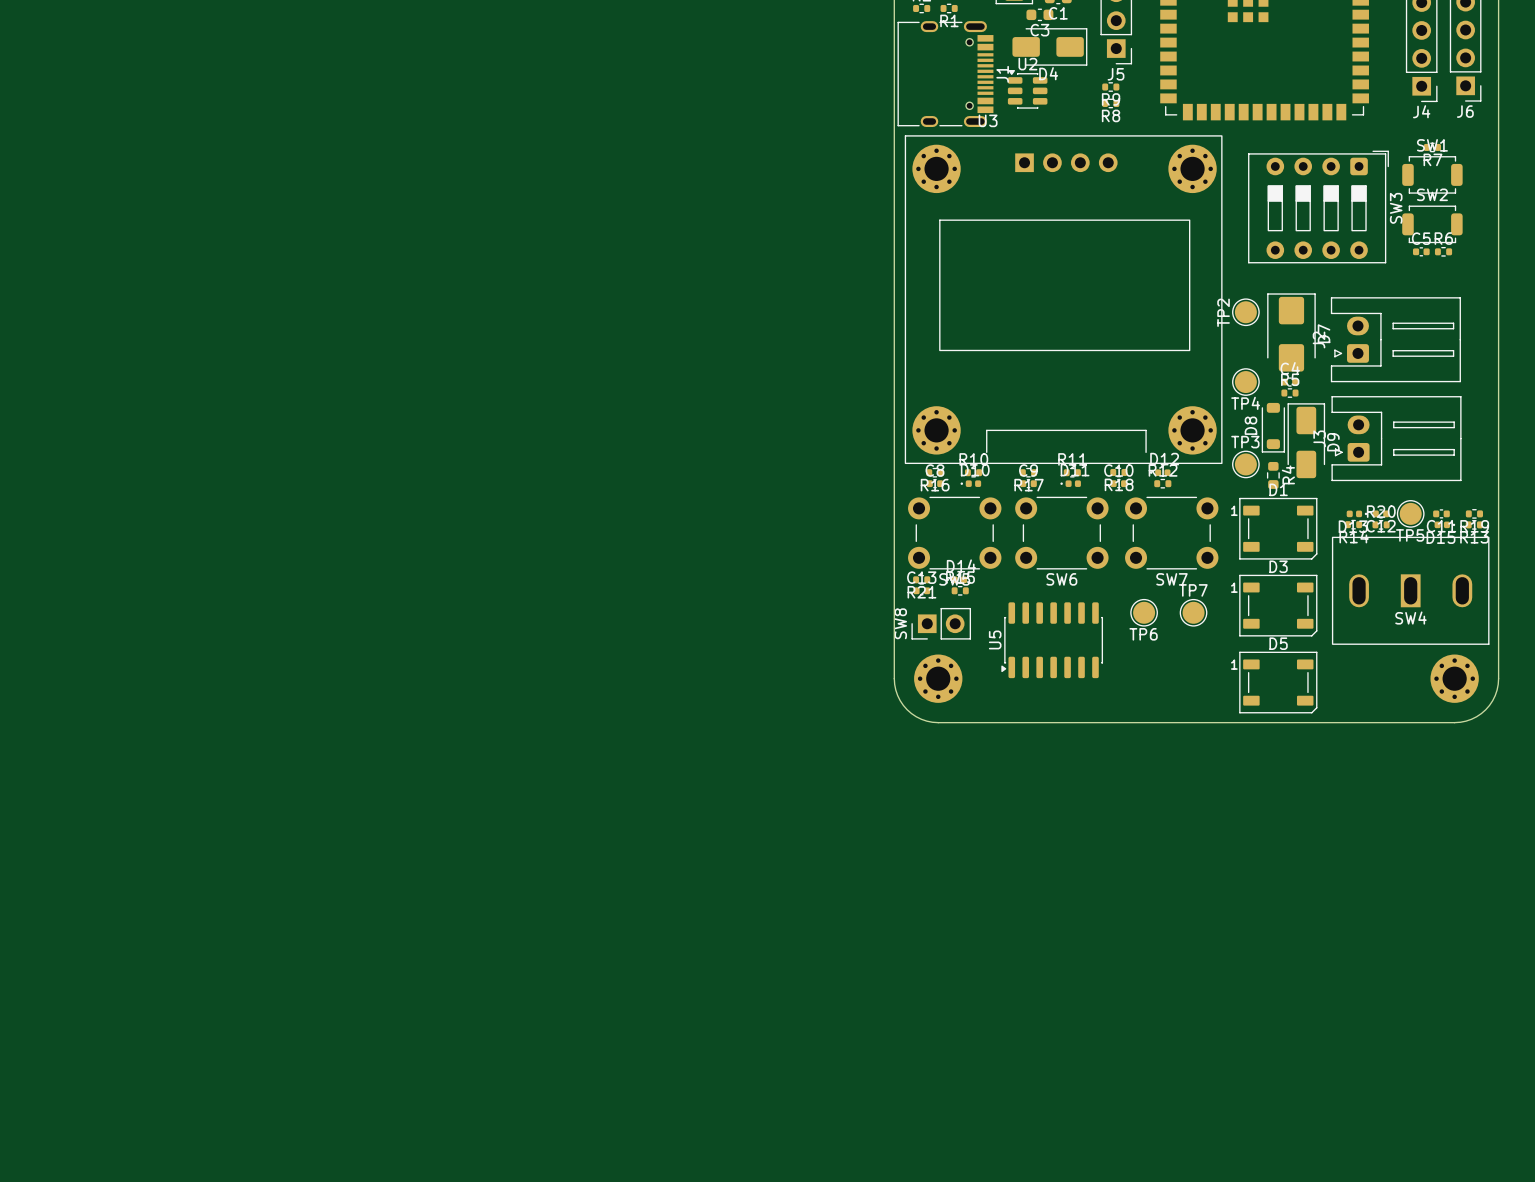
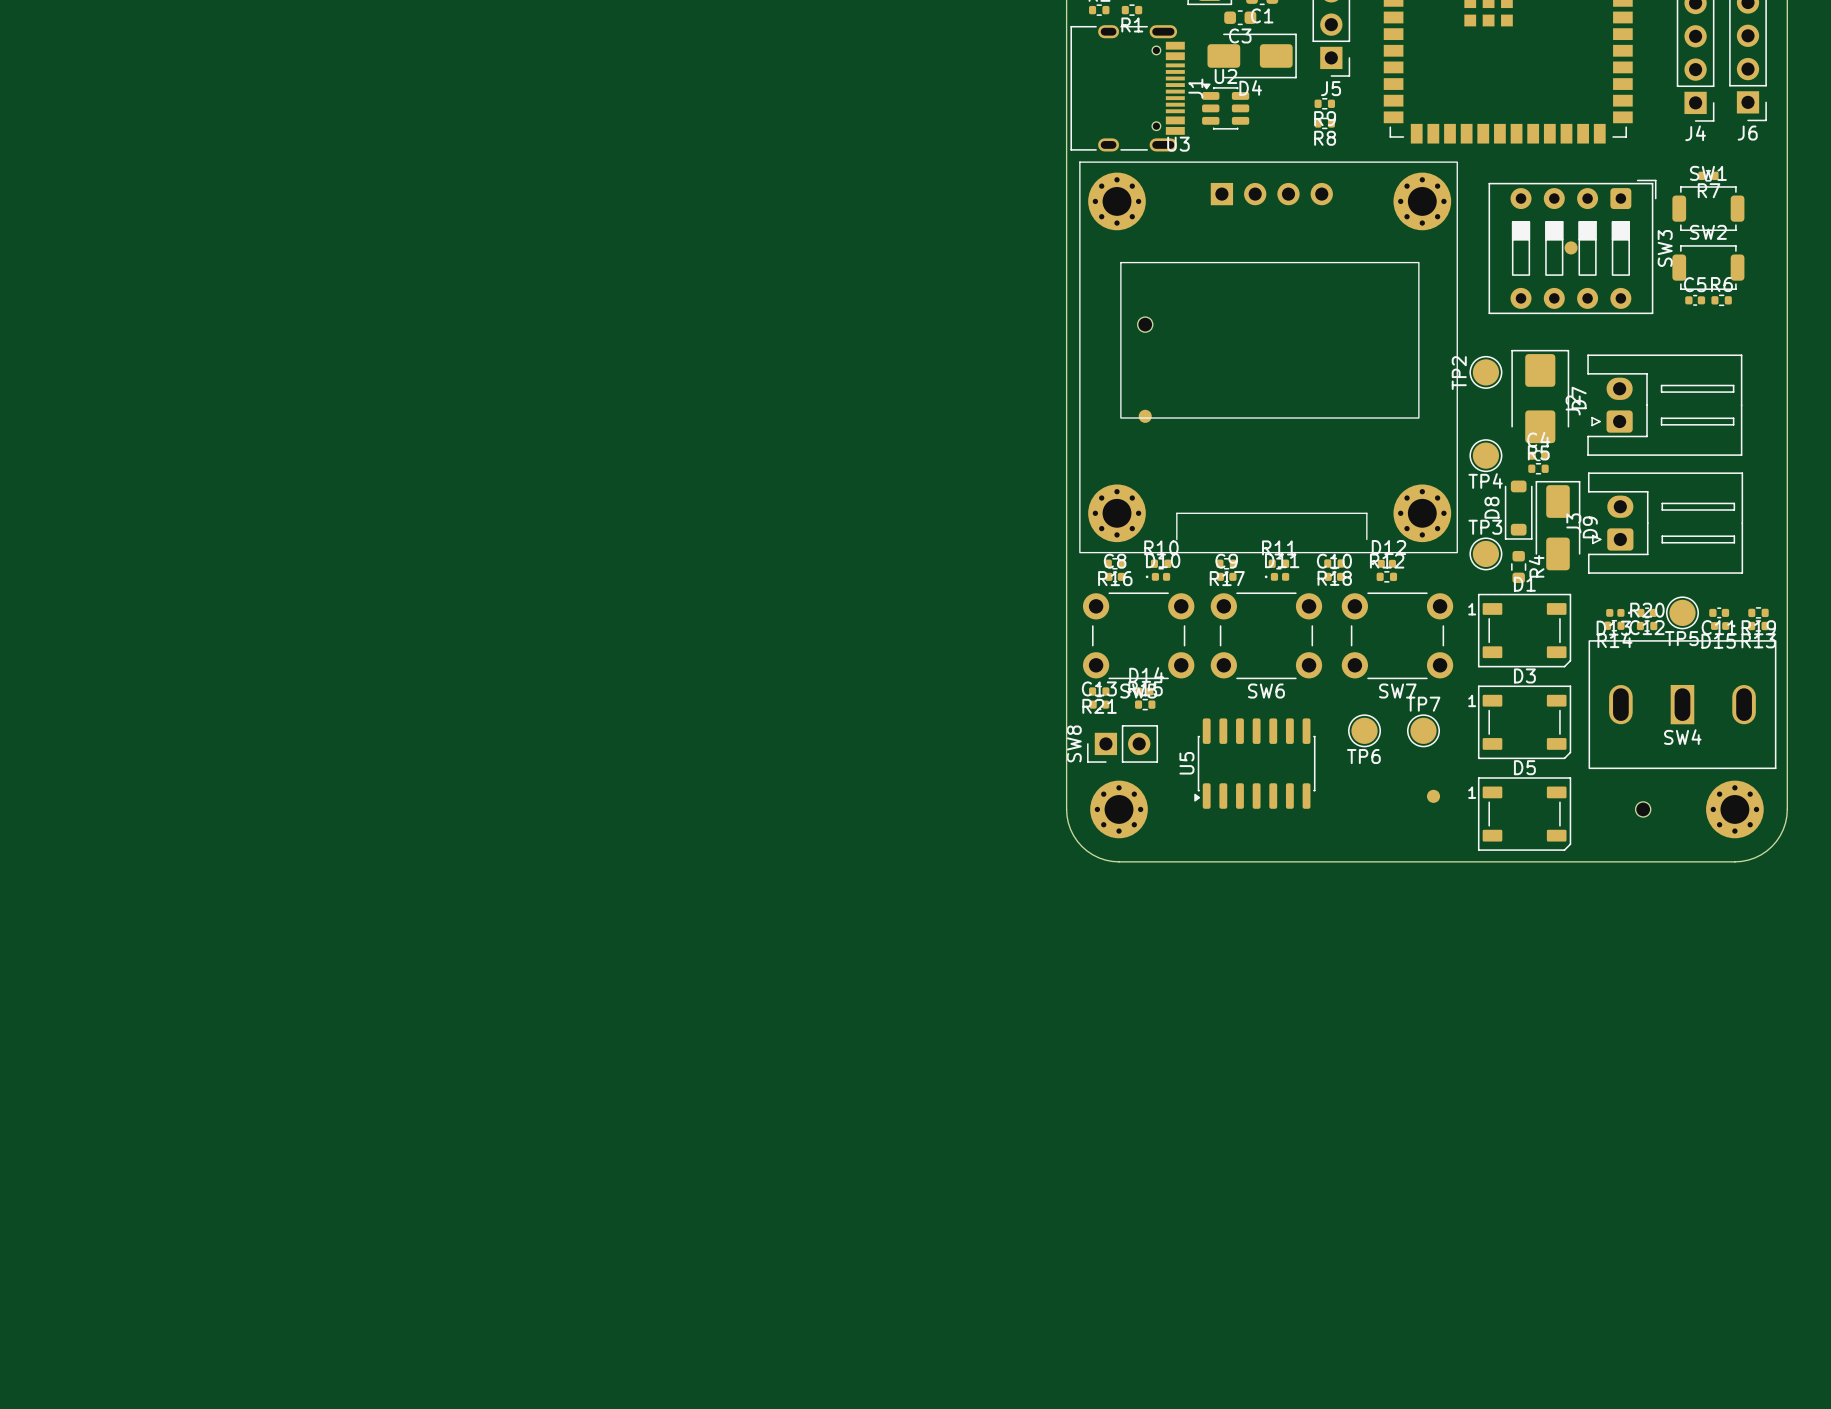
part: none -> (1571, 247)
part: none -> (1145, 324)
part: none -> (1145, 416)
part: none -> (1433, 796)
part: none -> (1643, 809)

